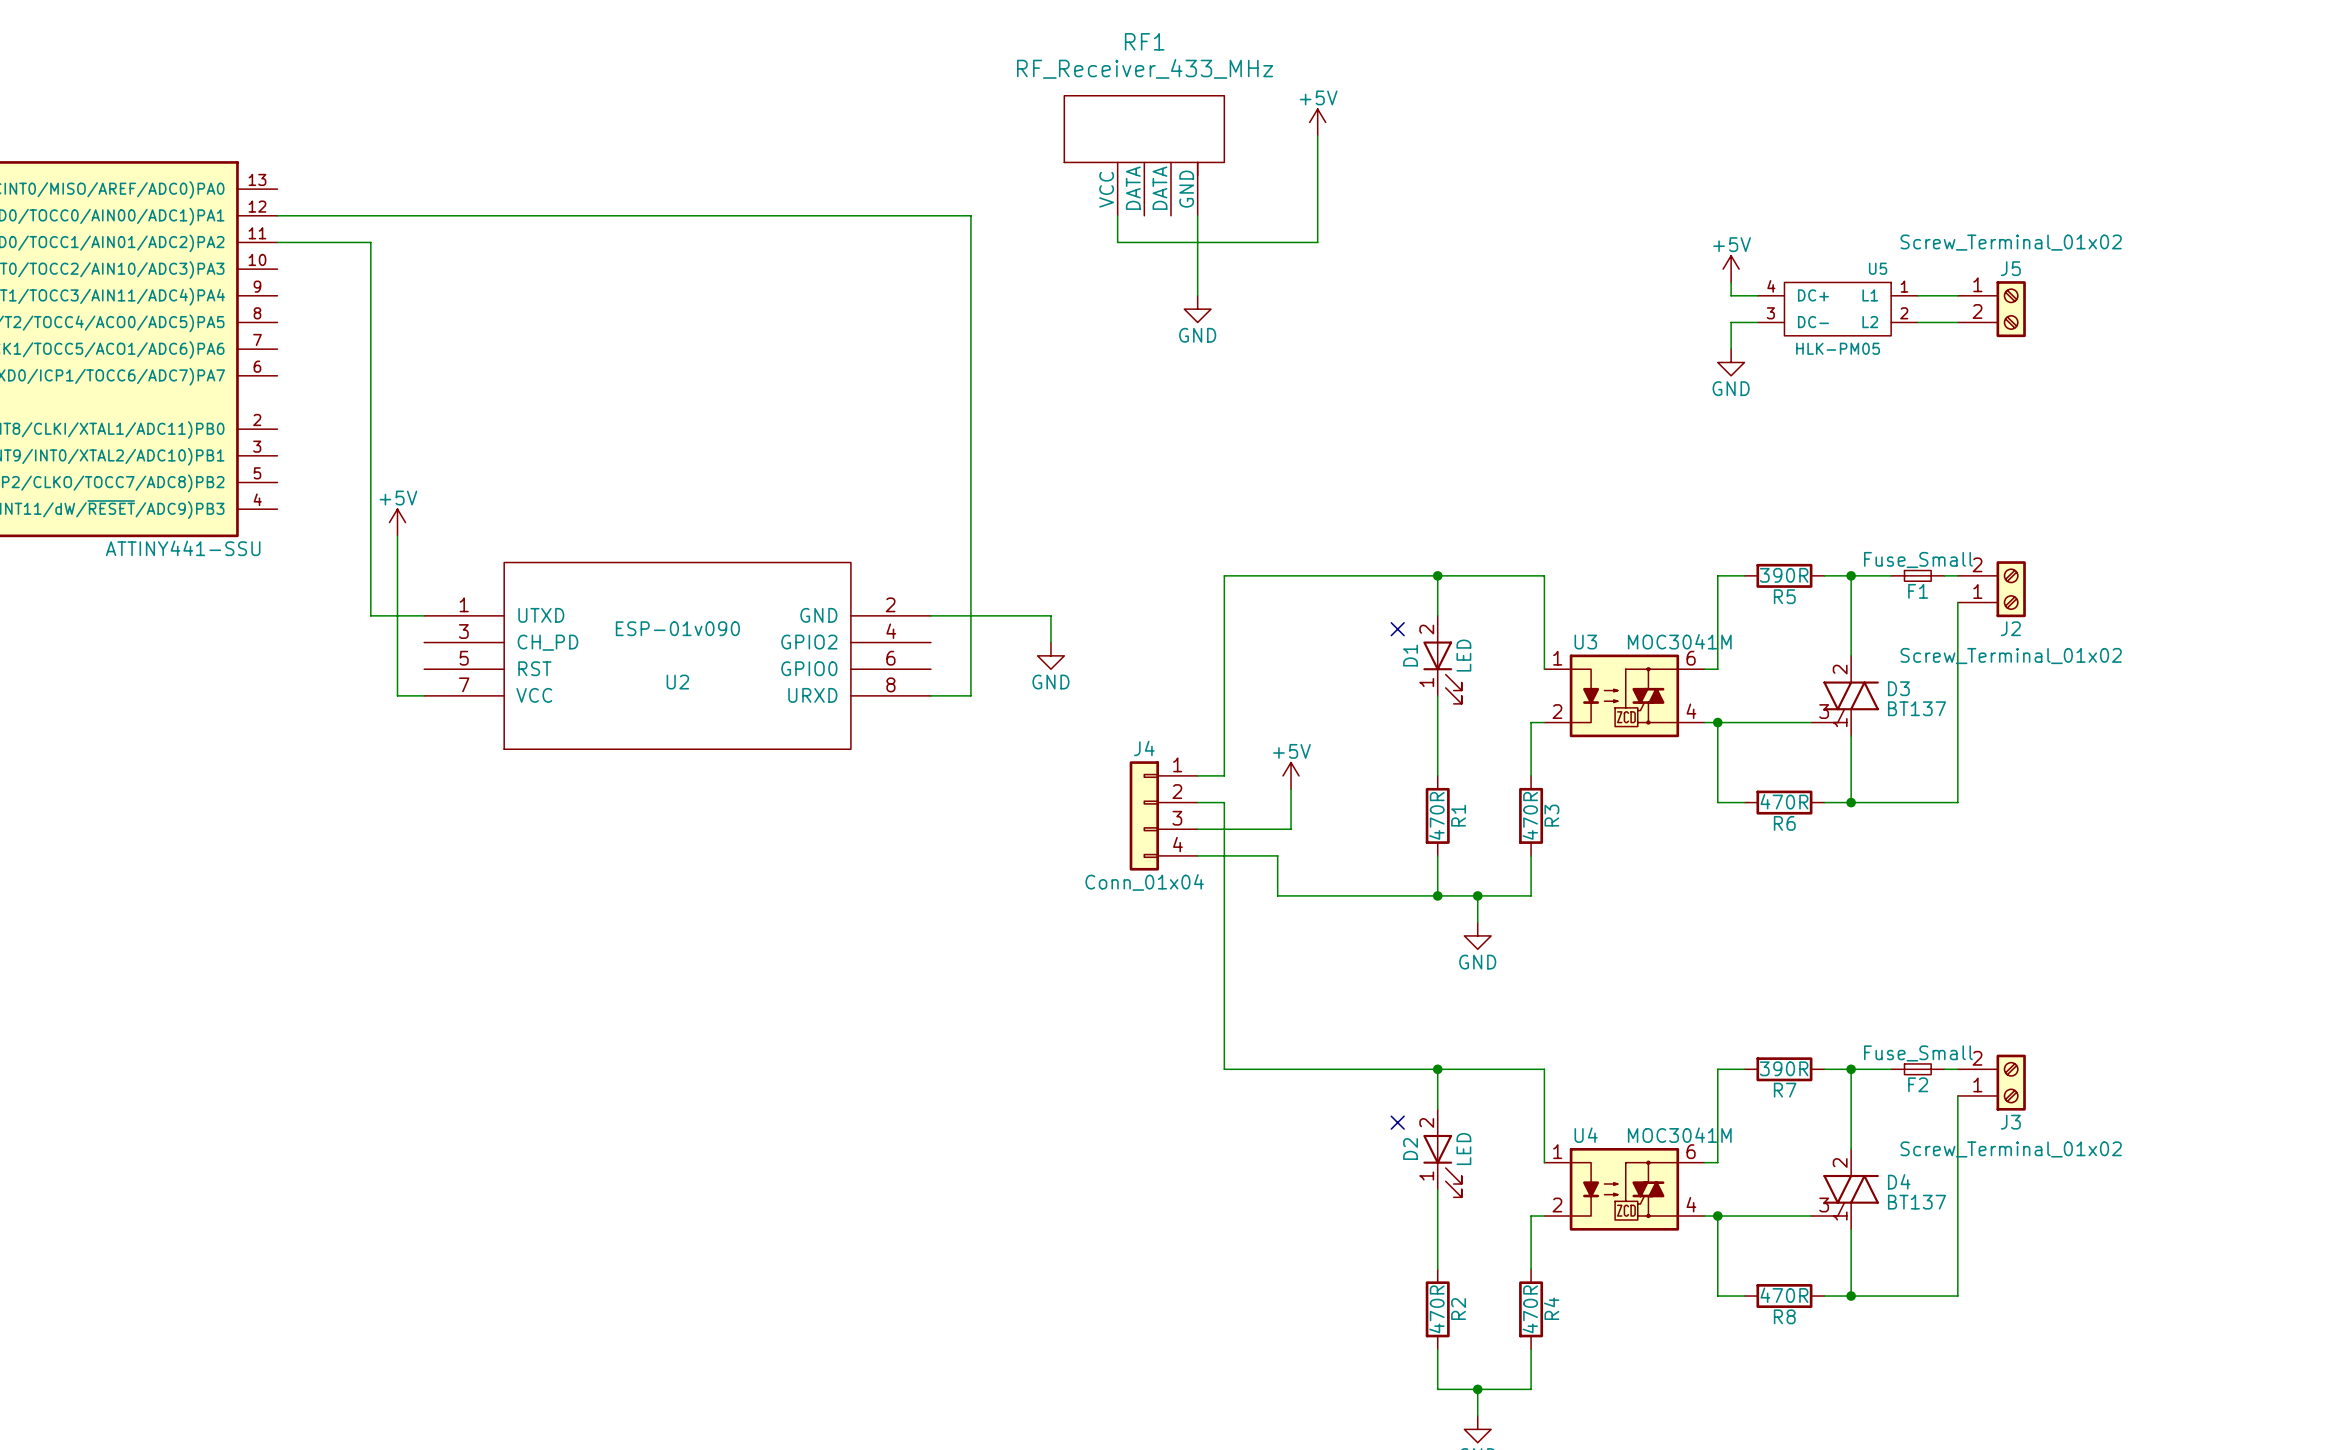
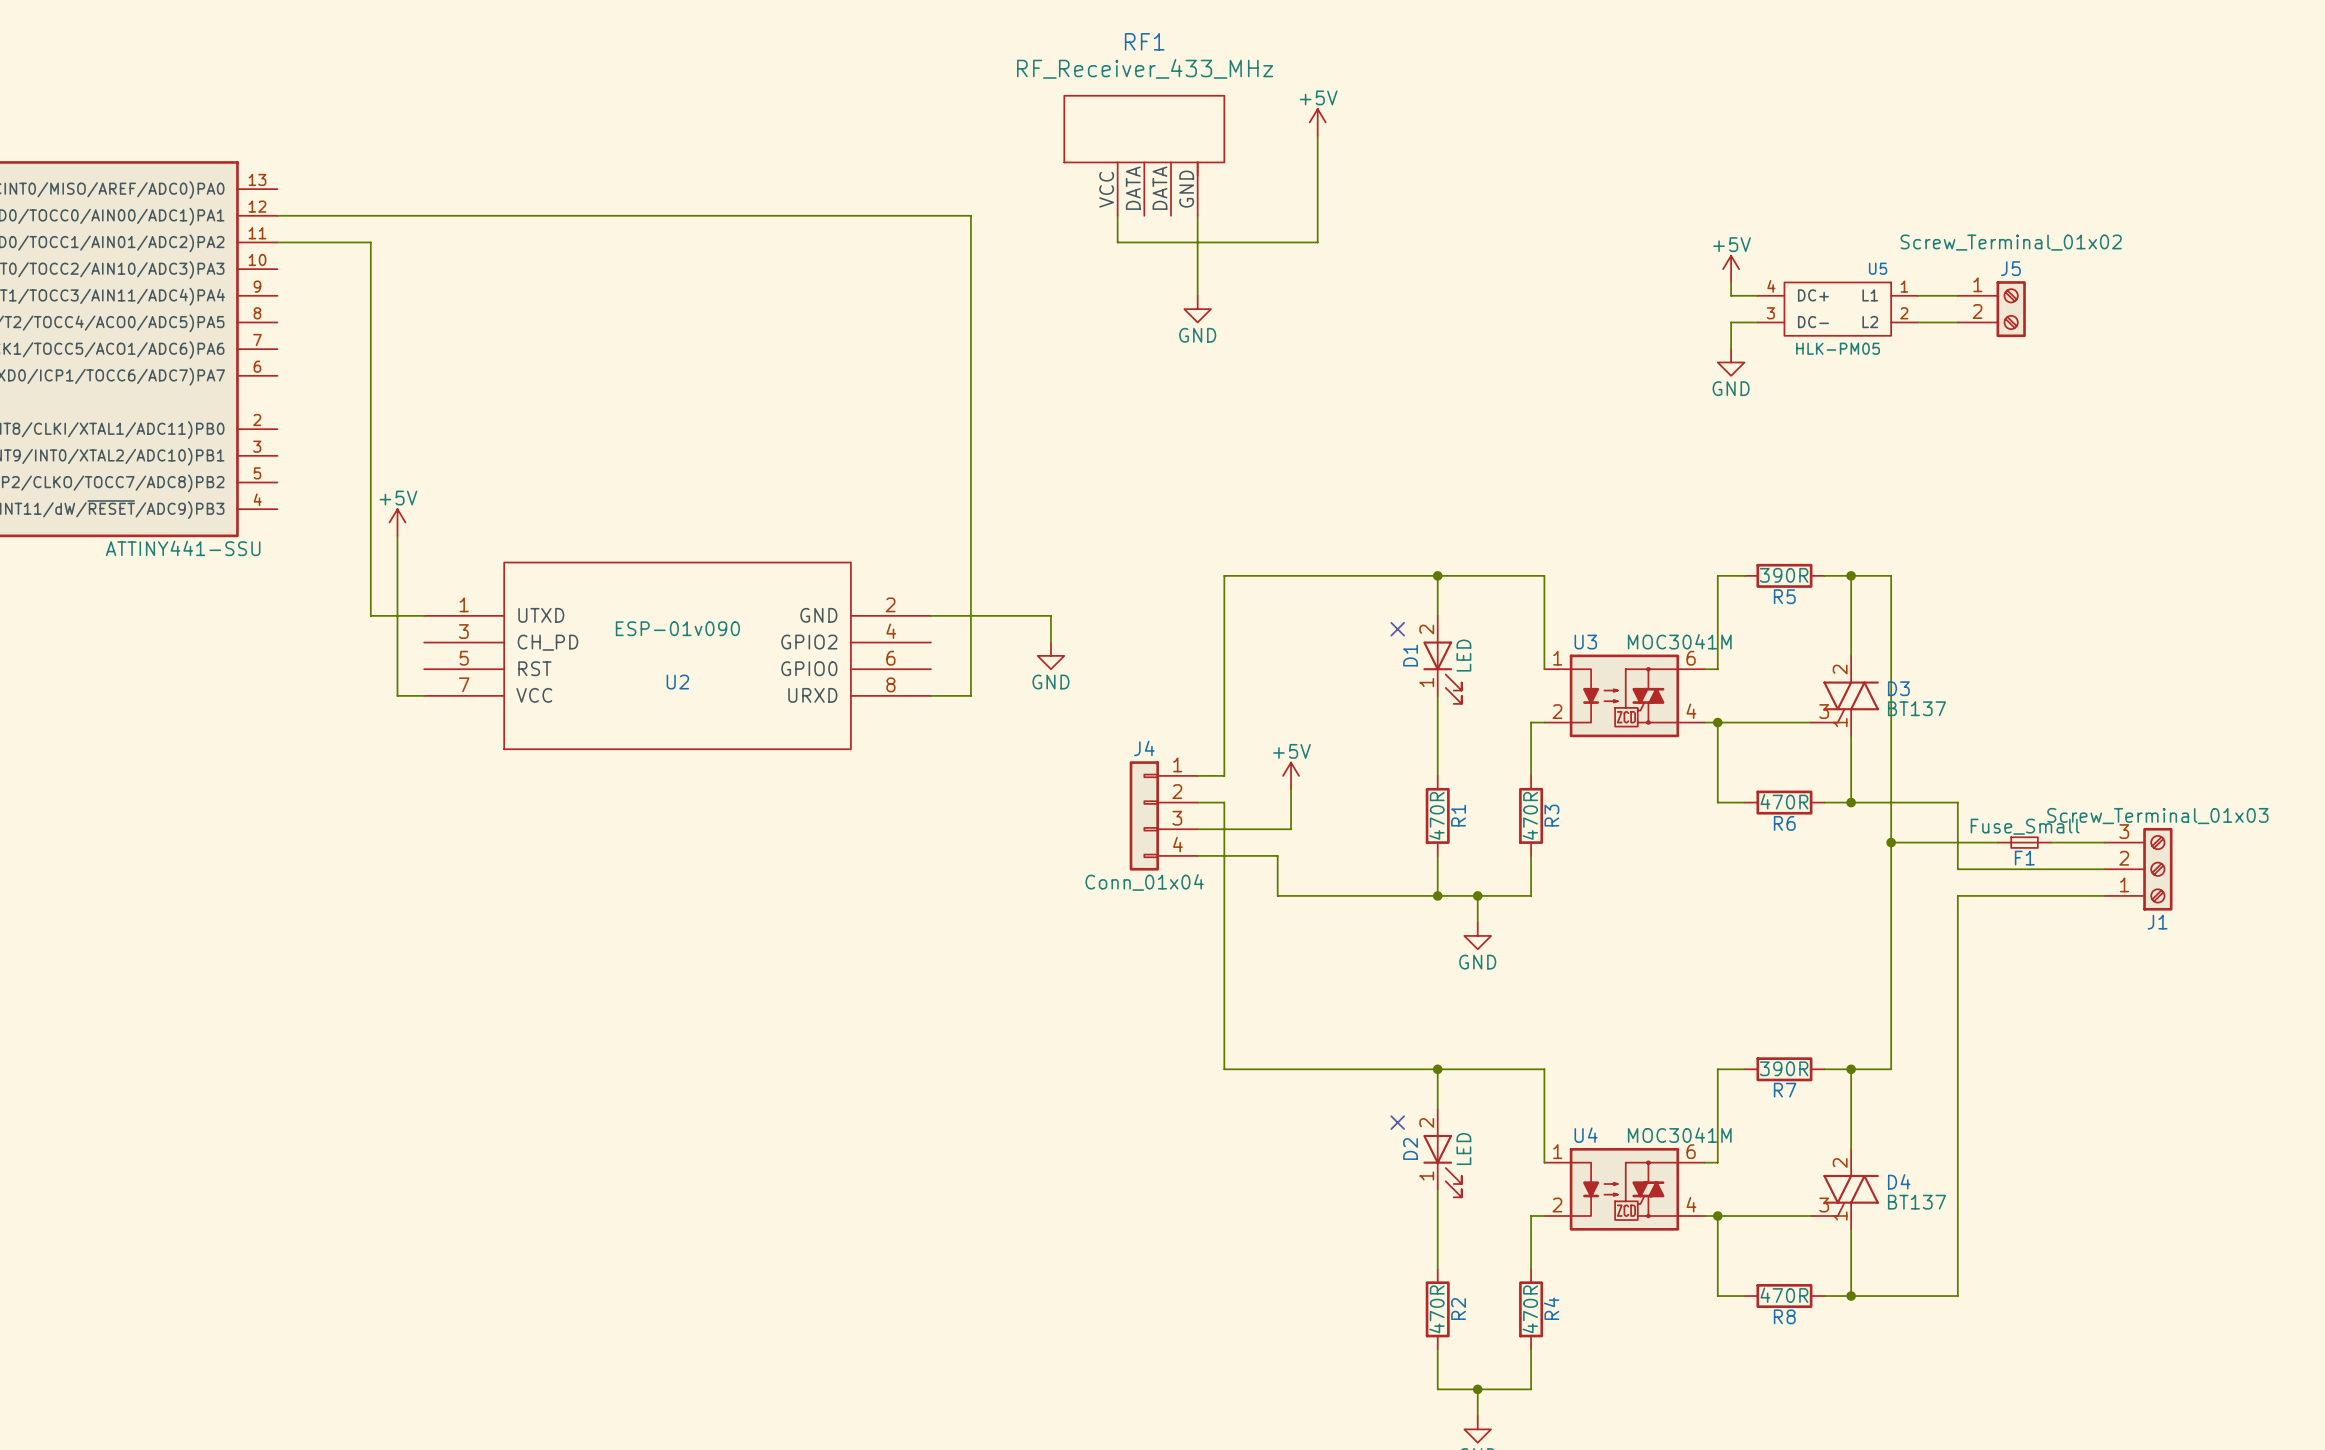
wire: none -> (1891, 575) (1891, 1069)
F1 position: (1917, 575) -> (2024, 842)
wire: (1944, 575) (1957, 575) -> none
J2: Screw_Terminal_01x02 (1991, 589) -> none
wire: (1957, 602) (1957, 802) -> (2104, 869) (1957, 869) (1957, 802)
wire: none -> (1891, 842) (1997, 842)
junction: none -> (1891, 842)
wire: none -> (2051, 842) (2104, 842)
J1: none -> Screw_Terminal_01x03 (2138, 869)
wire: none -> (2104, 895) (1957, 895) (1957, 1095)
F2: Fuse_Small (1917, 1069) -> none
wire: (1944, 1069) (1957, 1069) -> none
J3: Screw_Terminal_01x02 (1991, 1082) -> none

